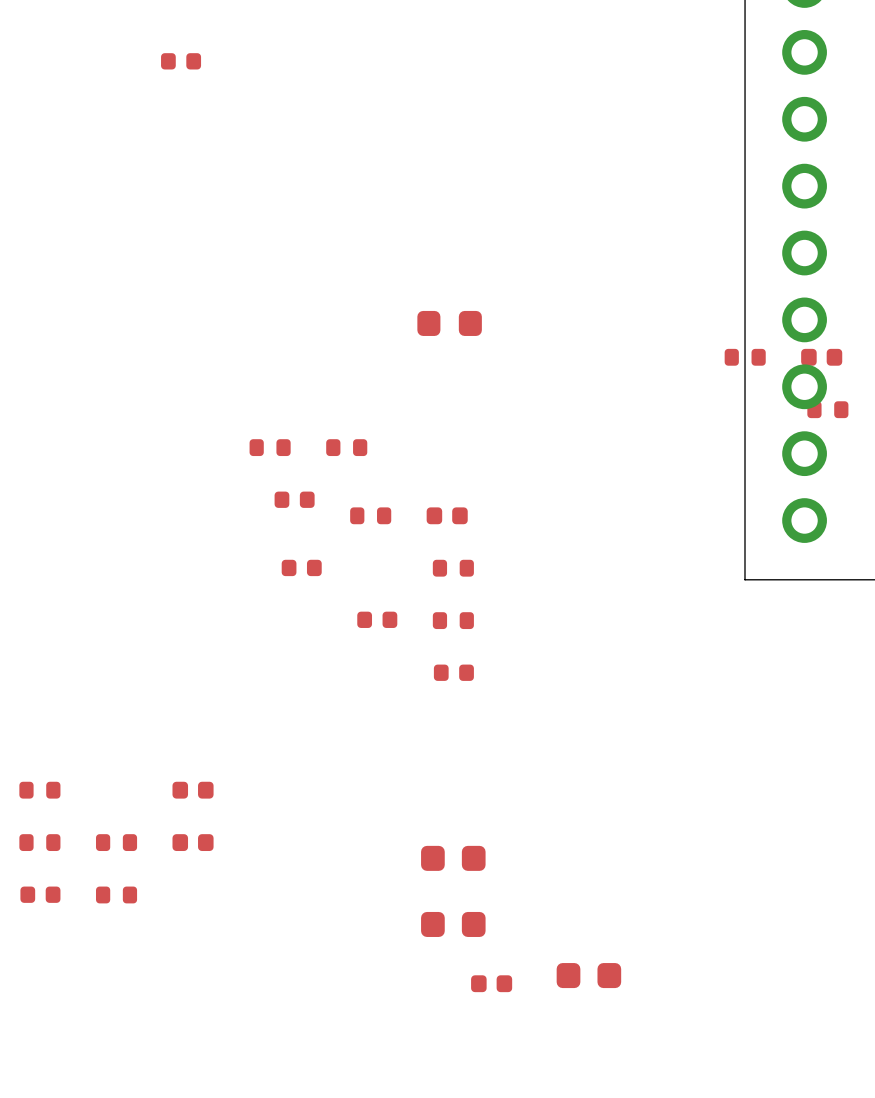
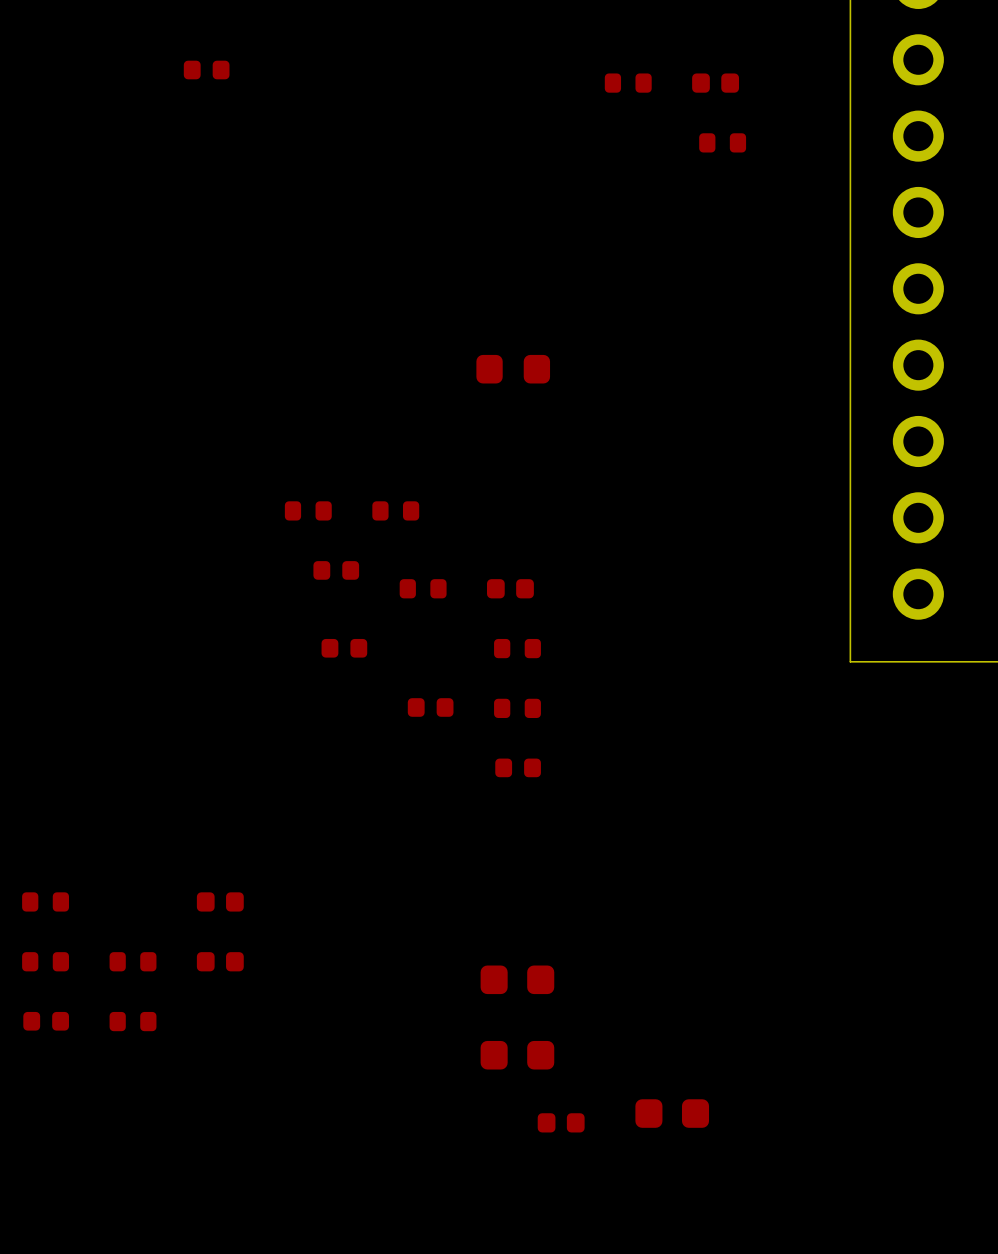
part: none -> (628, 83)
part: none -> (722, 142)
part: (745, 357) -> none
part position: (821, 357) -> (715, 83)
part: (827, 409) -> none

